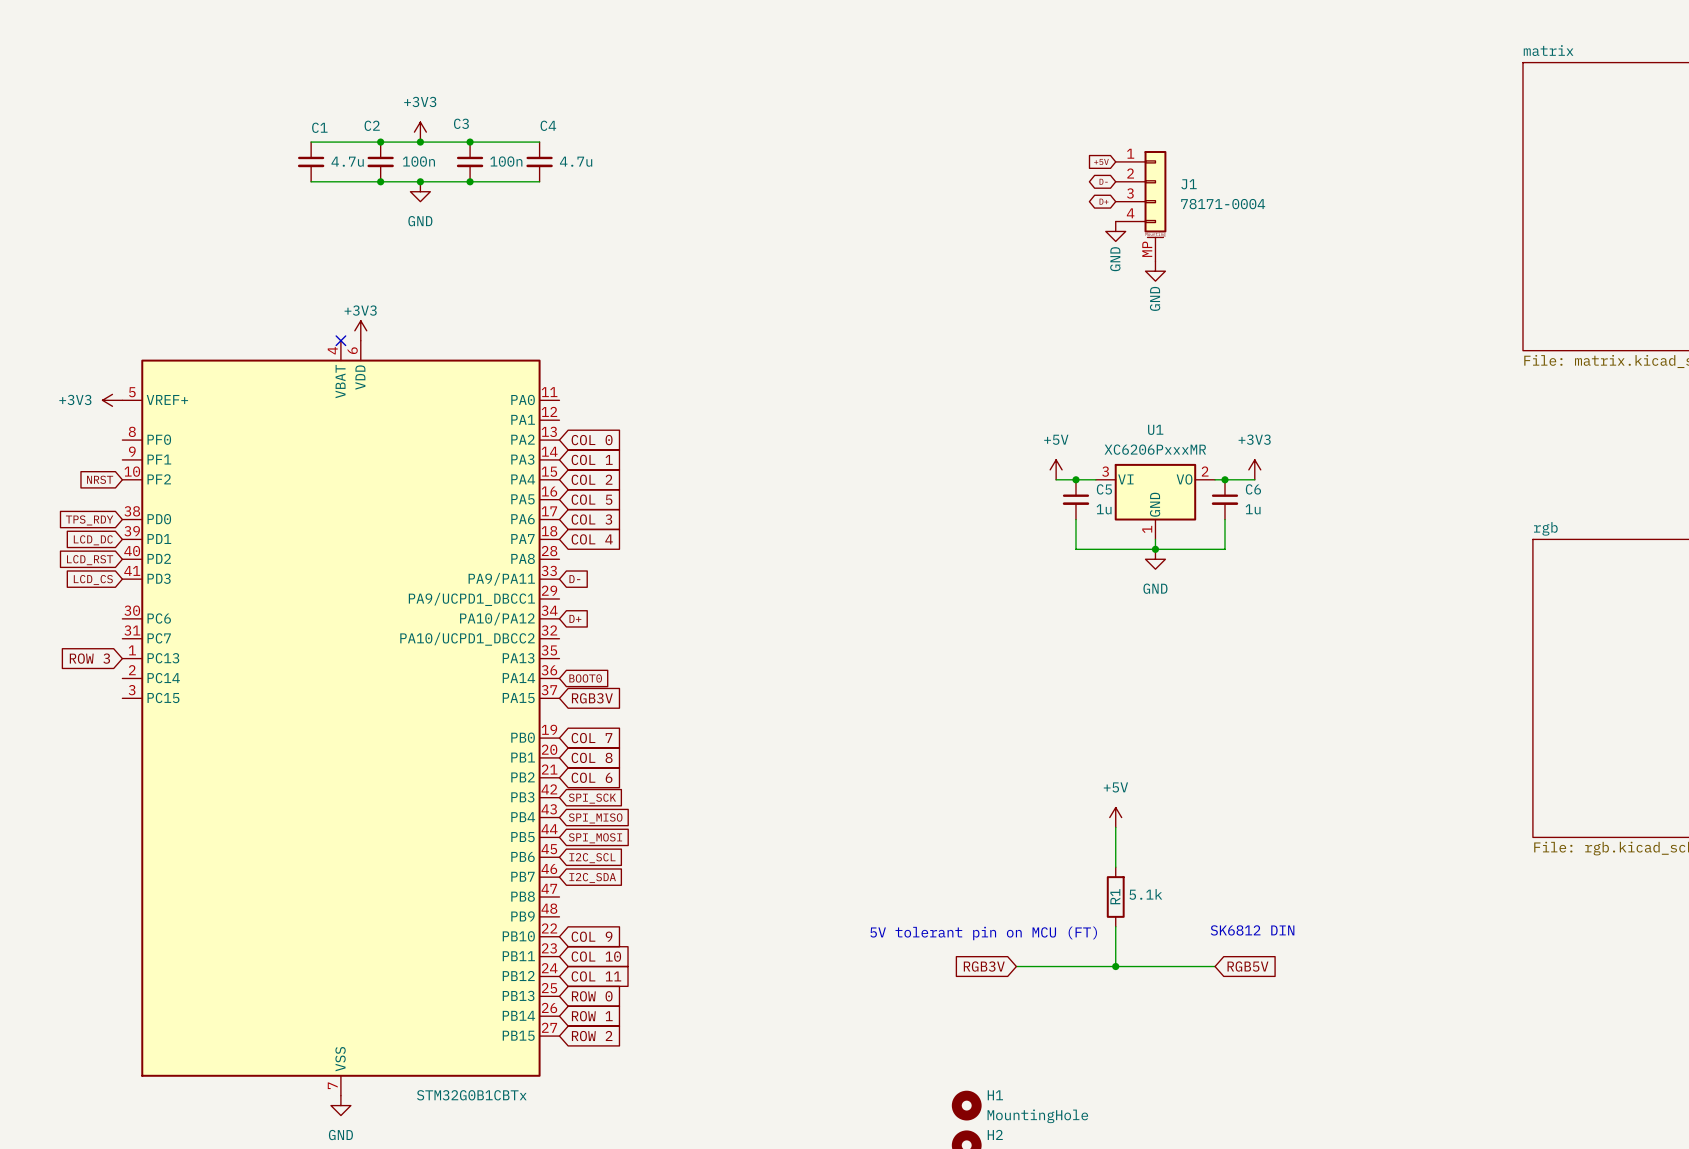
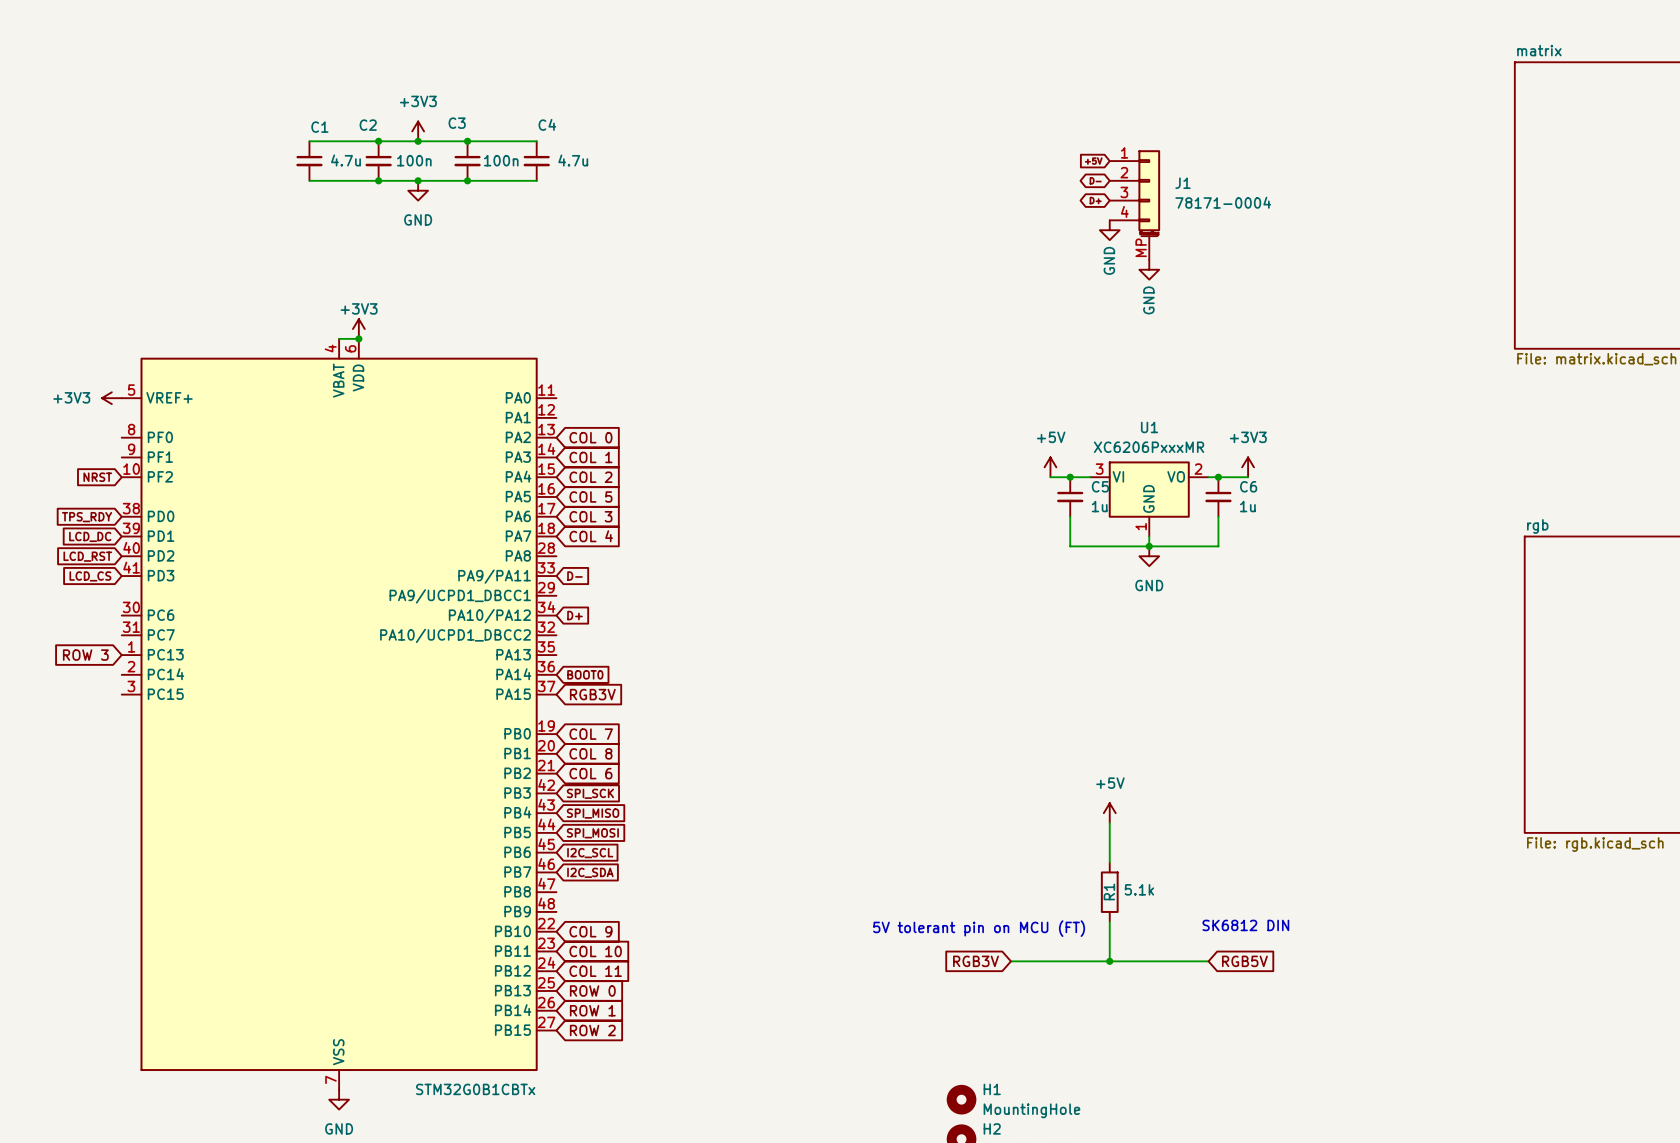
wire: none -> (339, 338) (358, 338)
no-connect mark: (340, 340) -> none
junction: none -> (358, 338)

